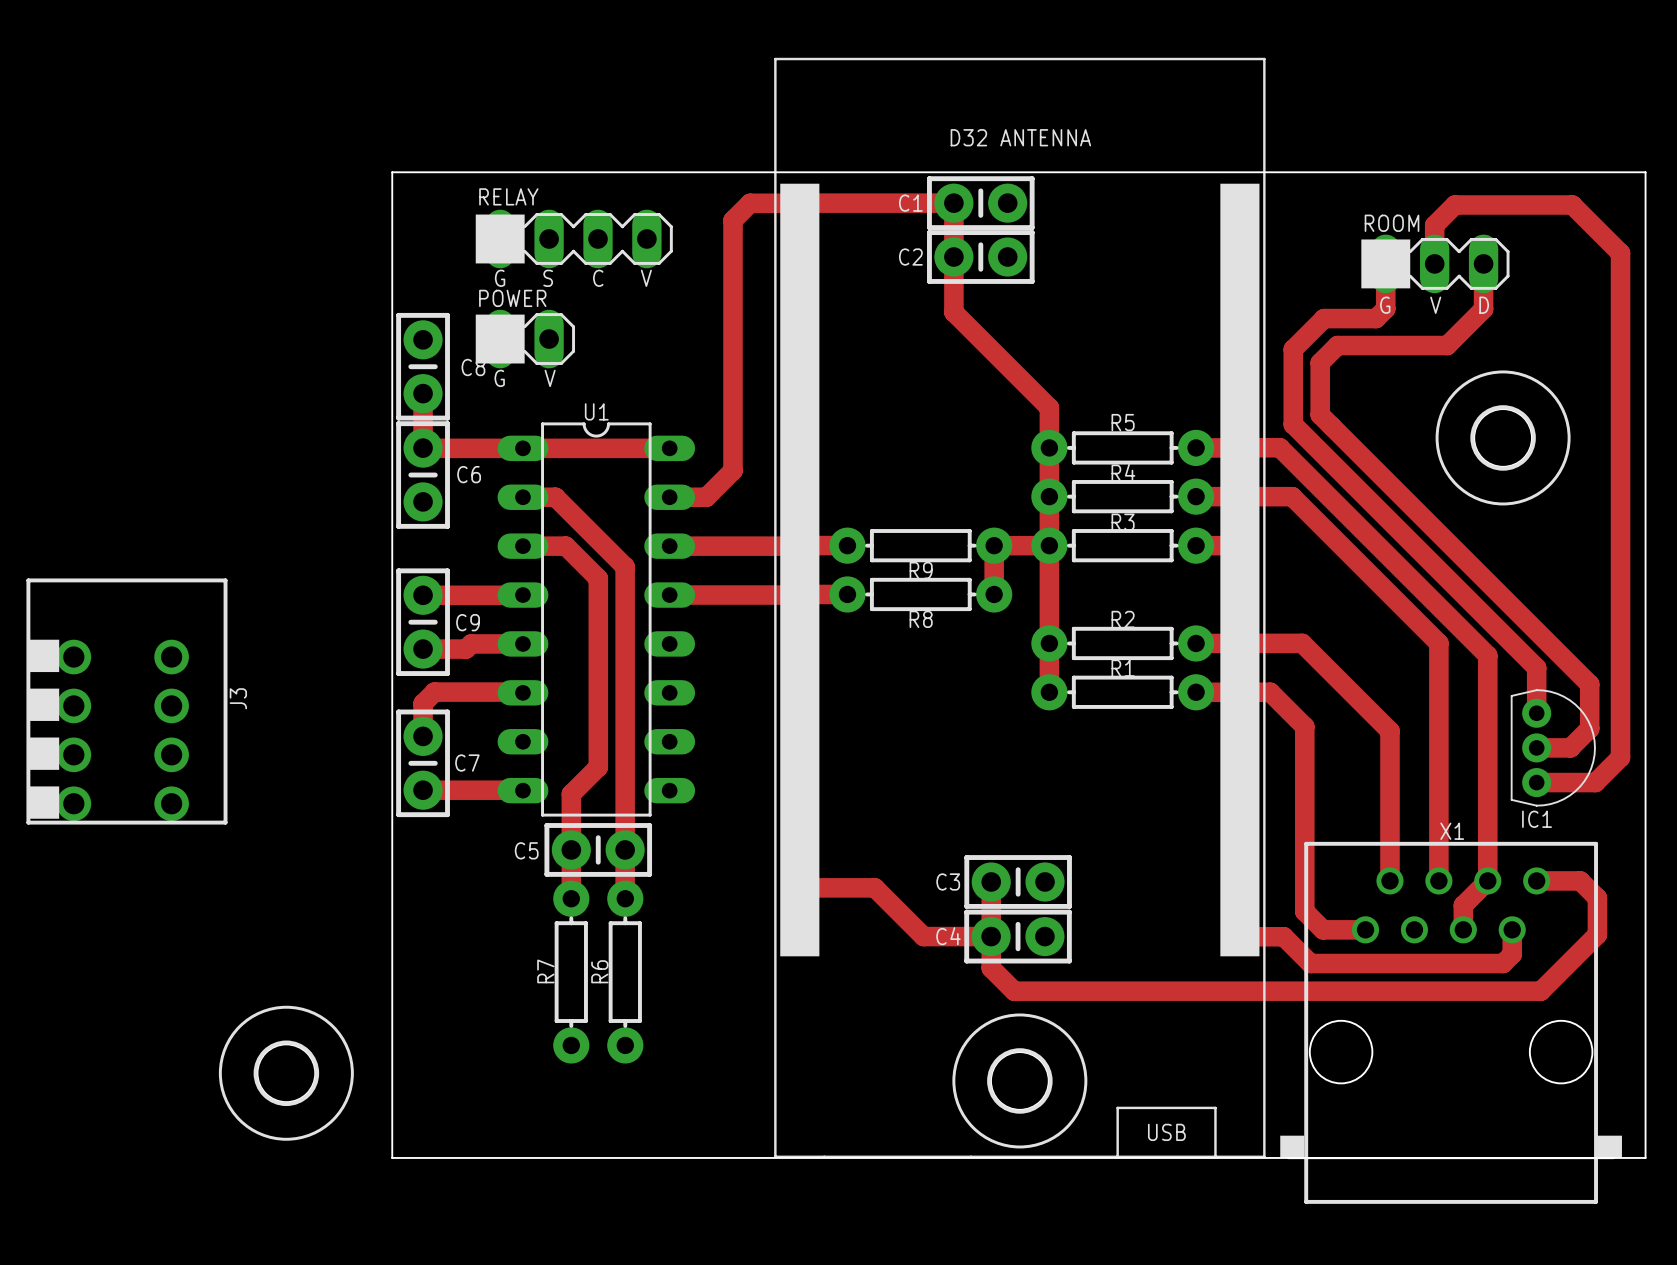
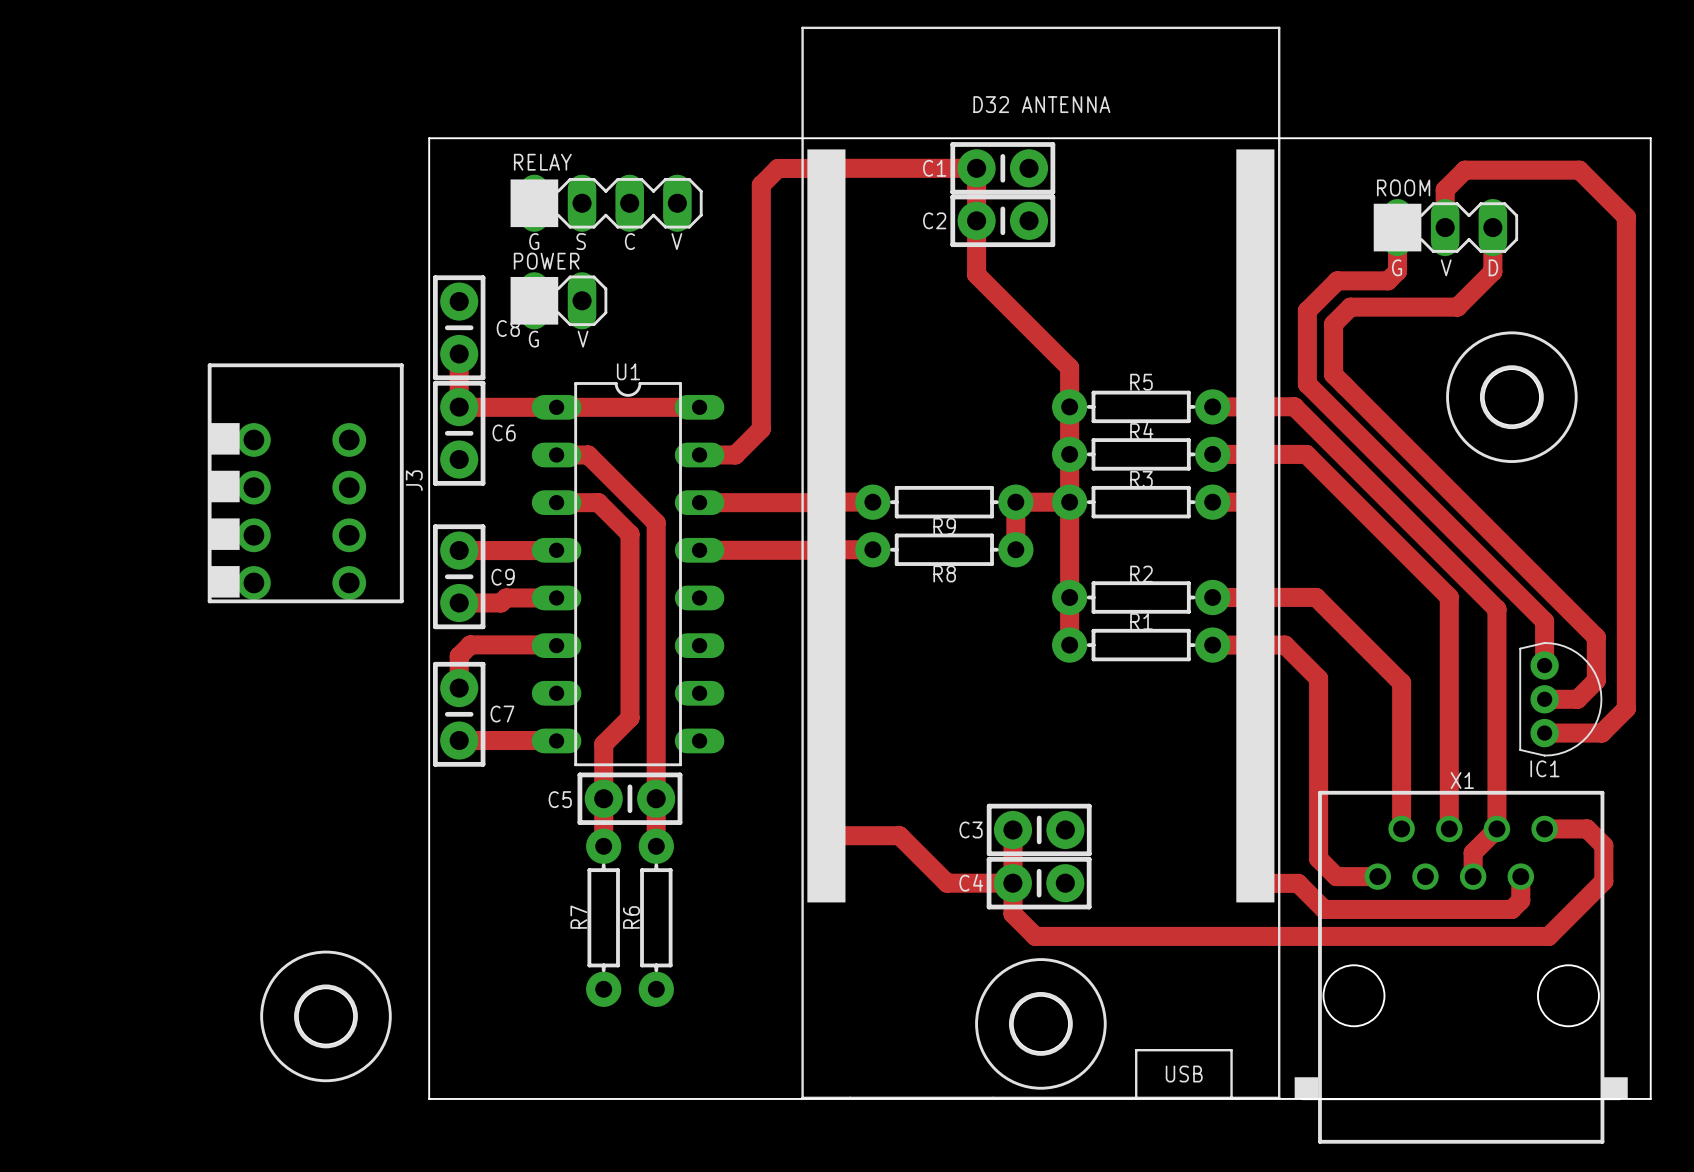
J3 position: (126, 701) -> (305, 483)

